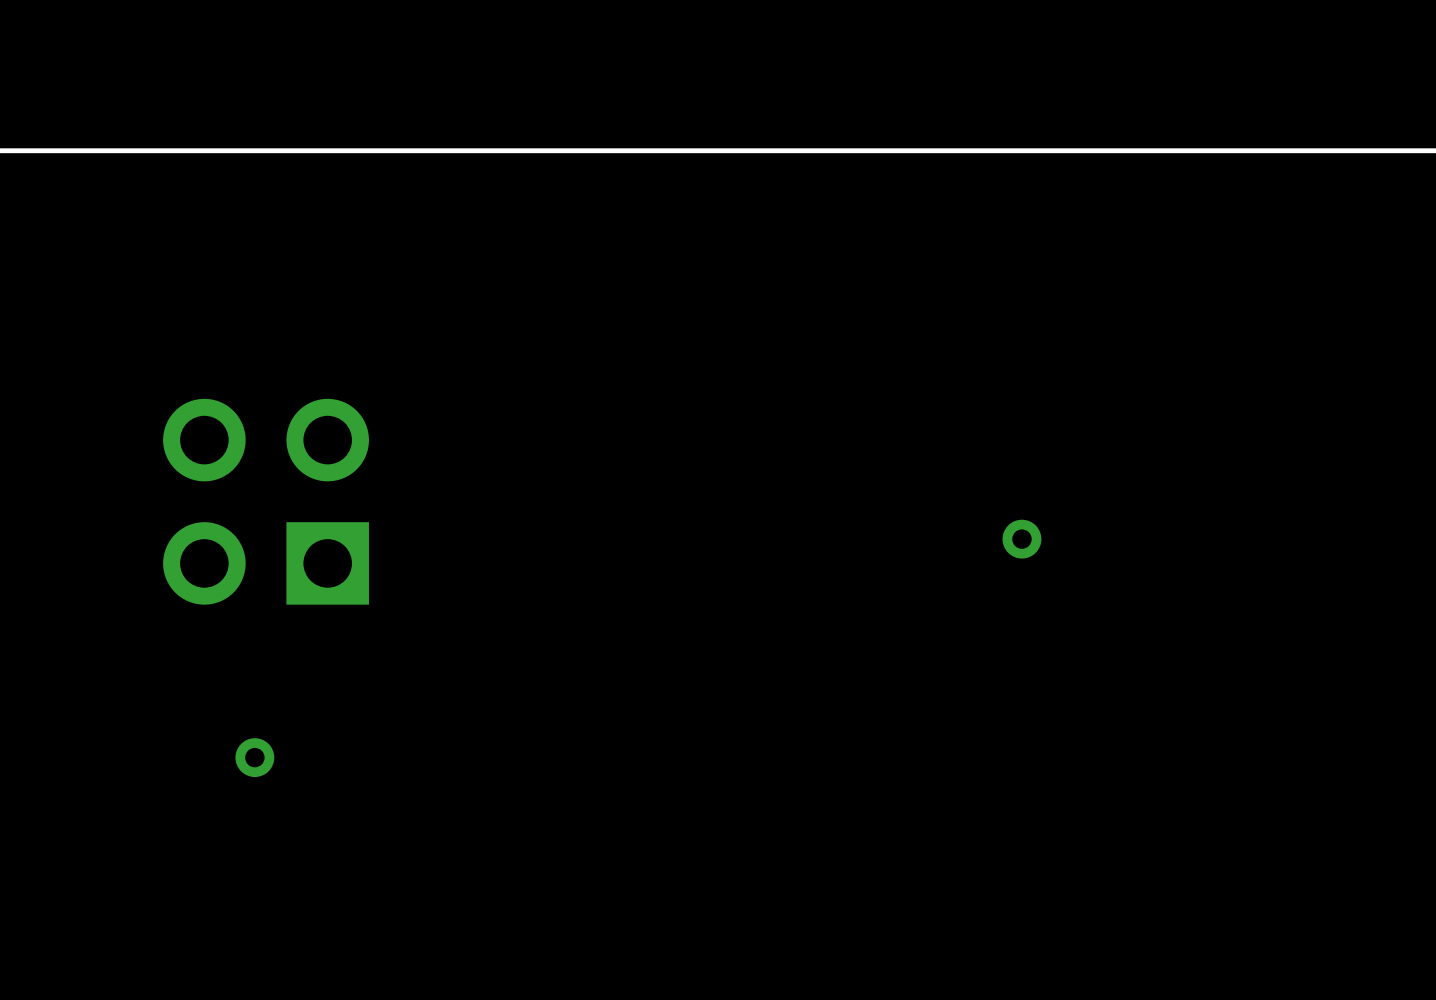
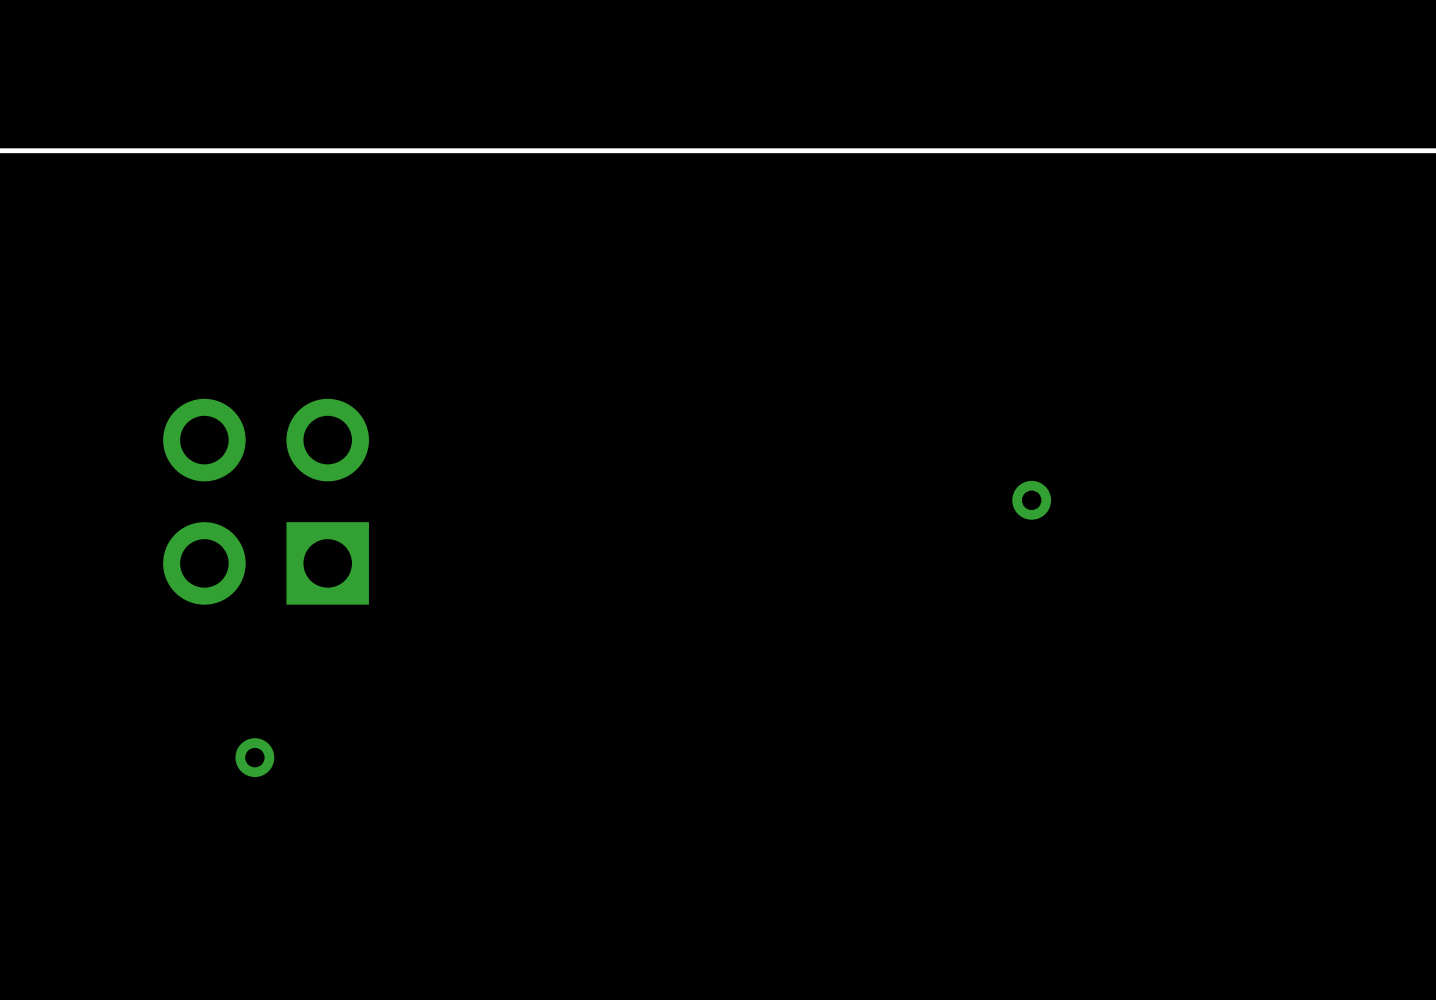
via position: (1021, 539) -> (1031, 500)

